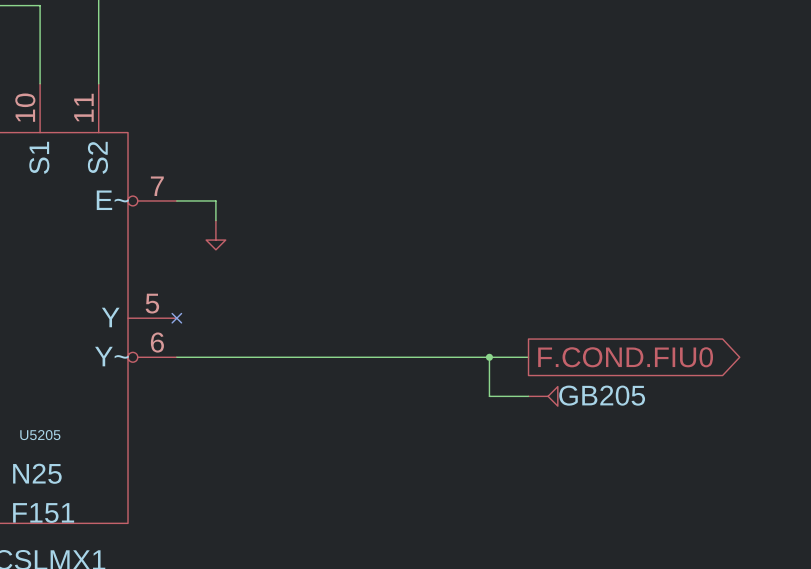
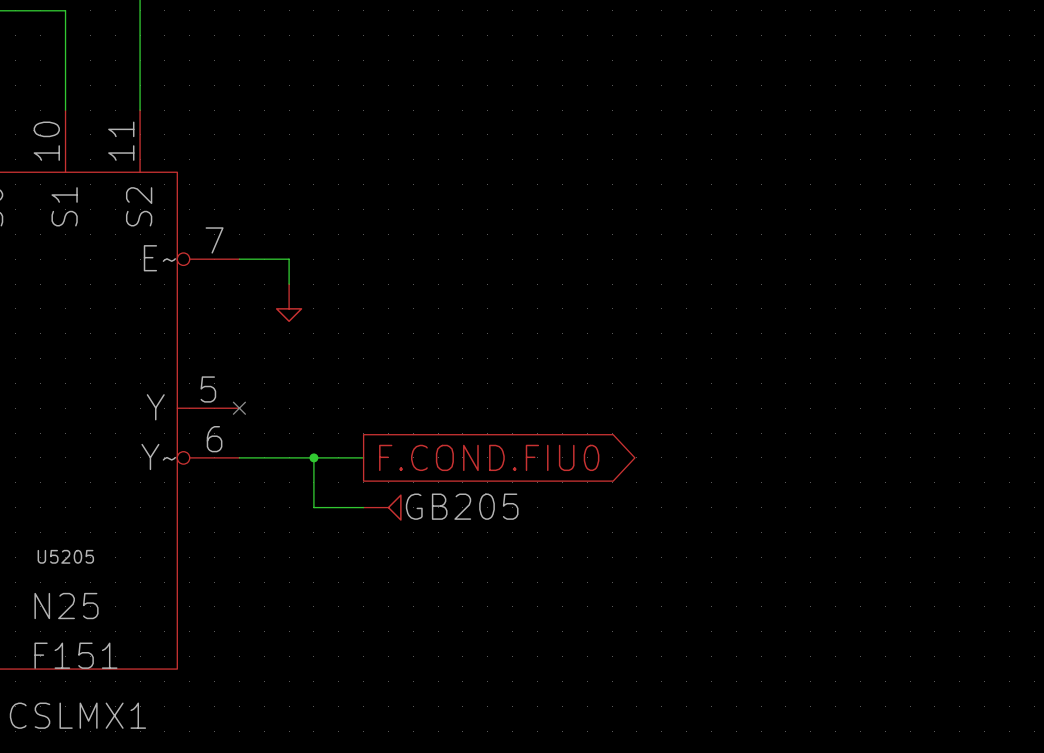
wire: none -> (313, 457) (313, 507) (363, 507)
junction: none -> (313, 457)
wire: (274, 357) (528, 357) -> none
global label: none -> F.COND.FIU0 (489, 457)
wire: (489, 357) (489, 396) (528, 396) -> none
junction: (489, 357) -> none
global label: F.COND.FIU0 (625, 357) -> none
GB205 position: (543, 396) -> (382, 507)

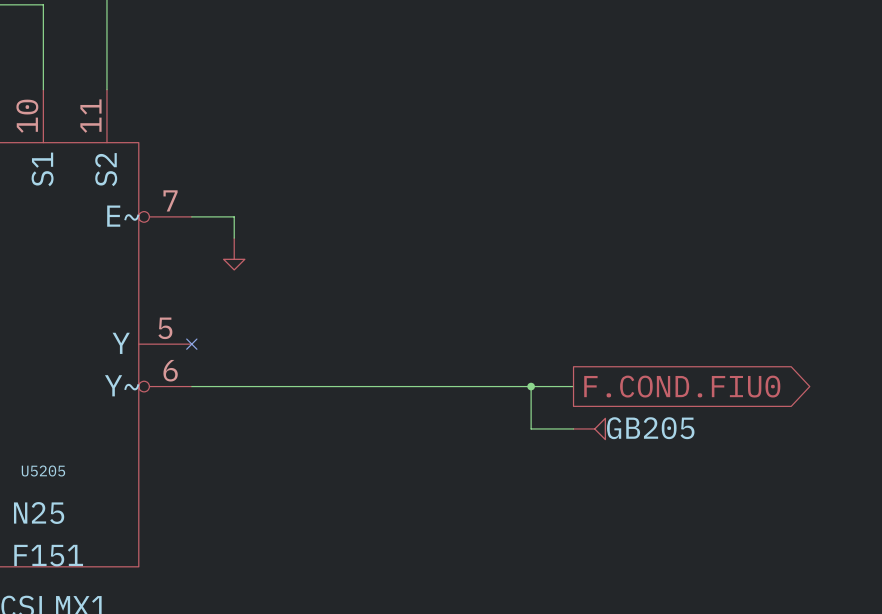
wire: (313, 457) (313, 507) (363, 507) -> none
junction: (313, 457) -> none
wire: none -> (297, 386) (573, 386)
global label: F.COND.FIU0 (489, 457) -> none
wire: none -> (531, 386) (531, 428) (573, 428)
junction: none -> (531, 386)
global label: none -> F.COND.FIU0 (682, 386)
GB205 position: (382, 507) -> (589, 428)

